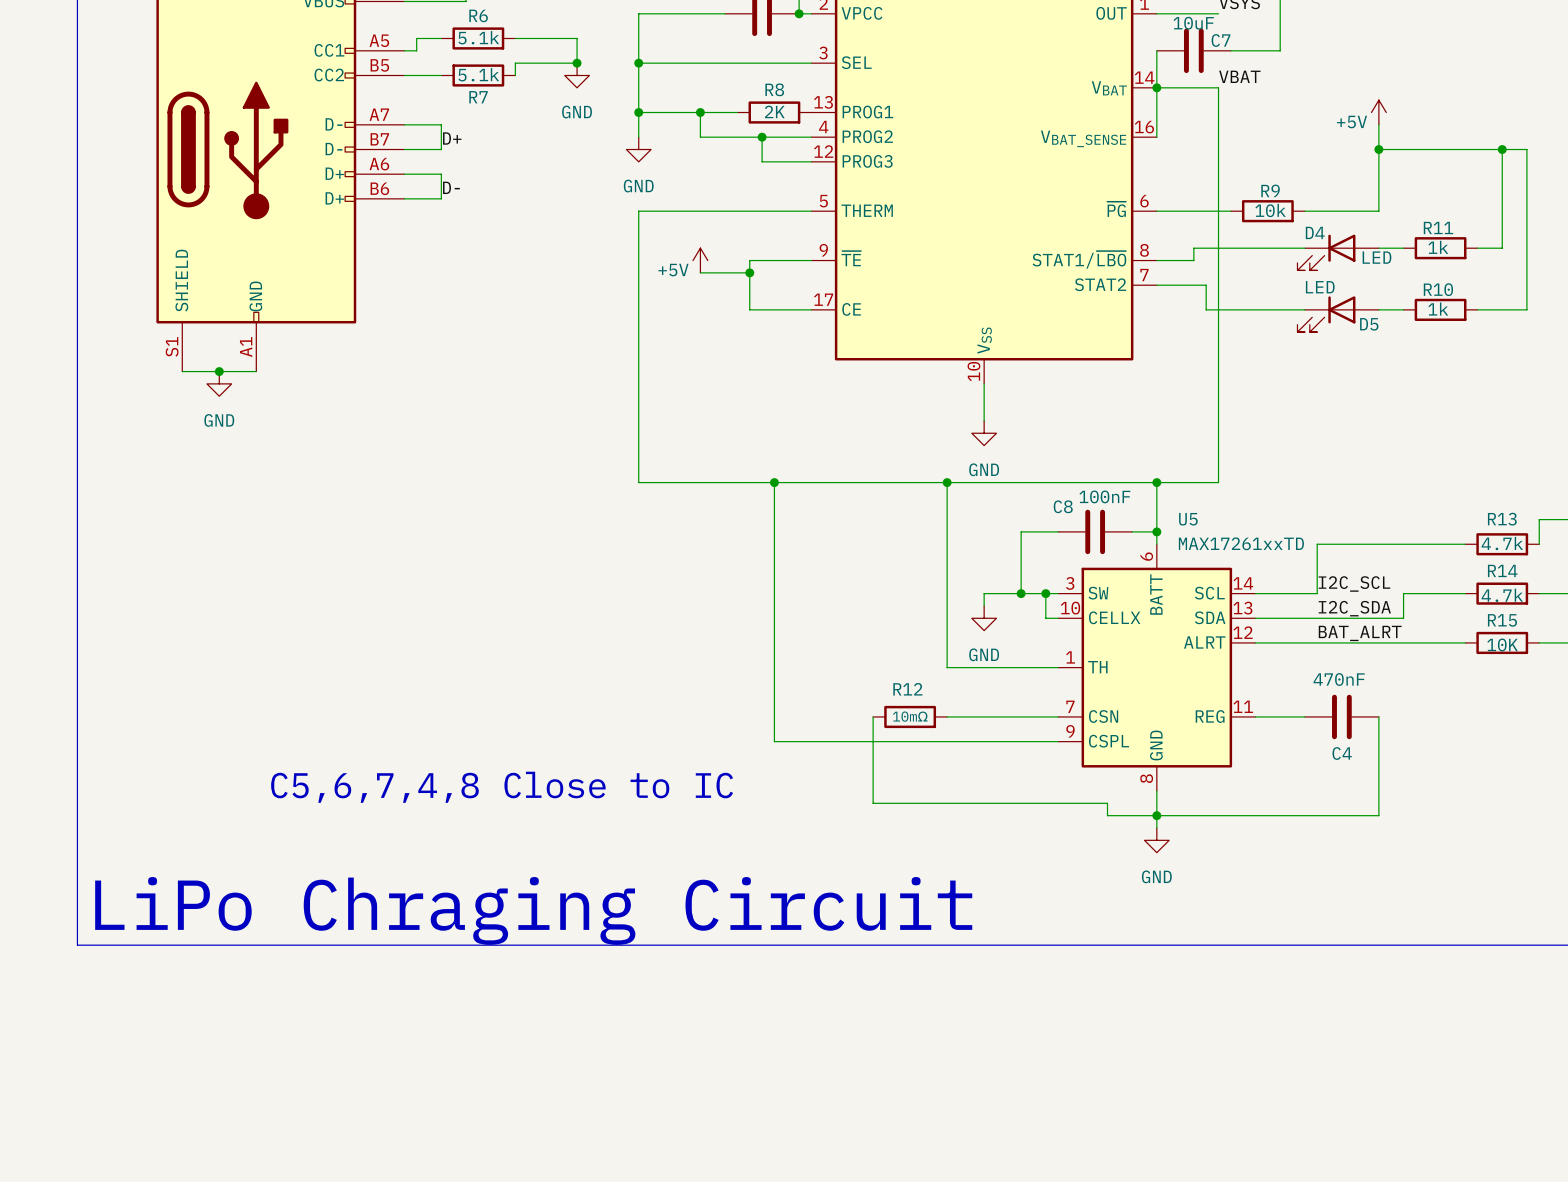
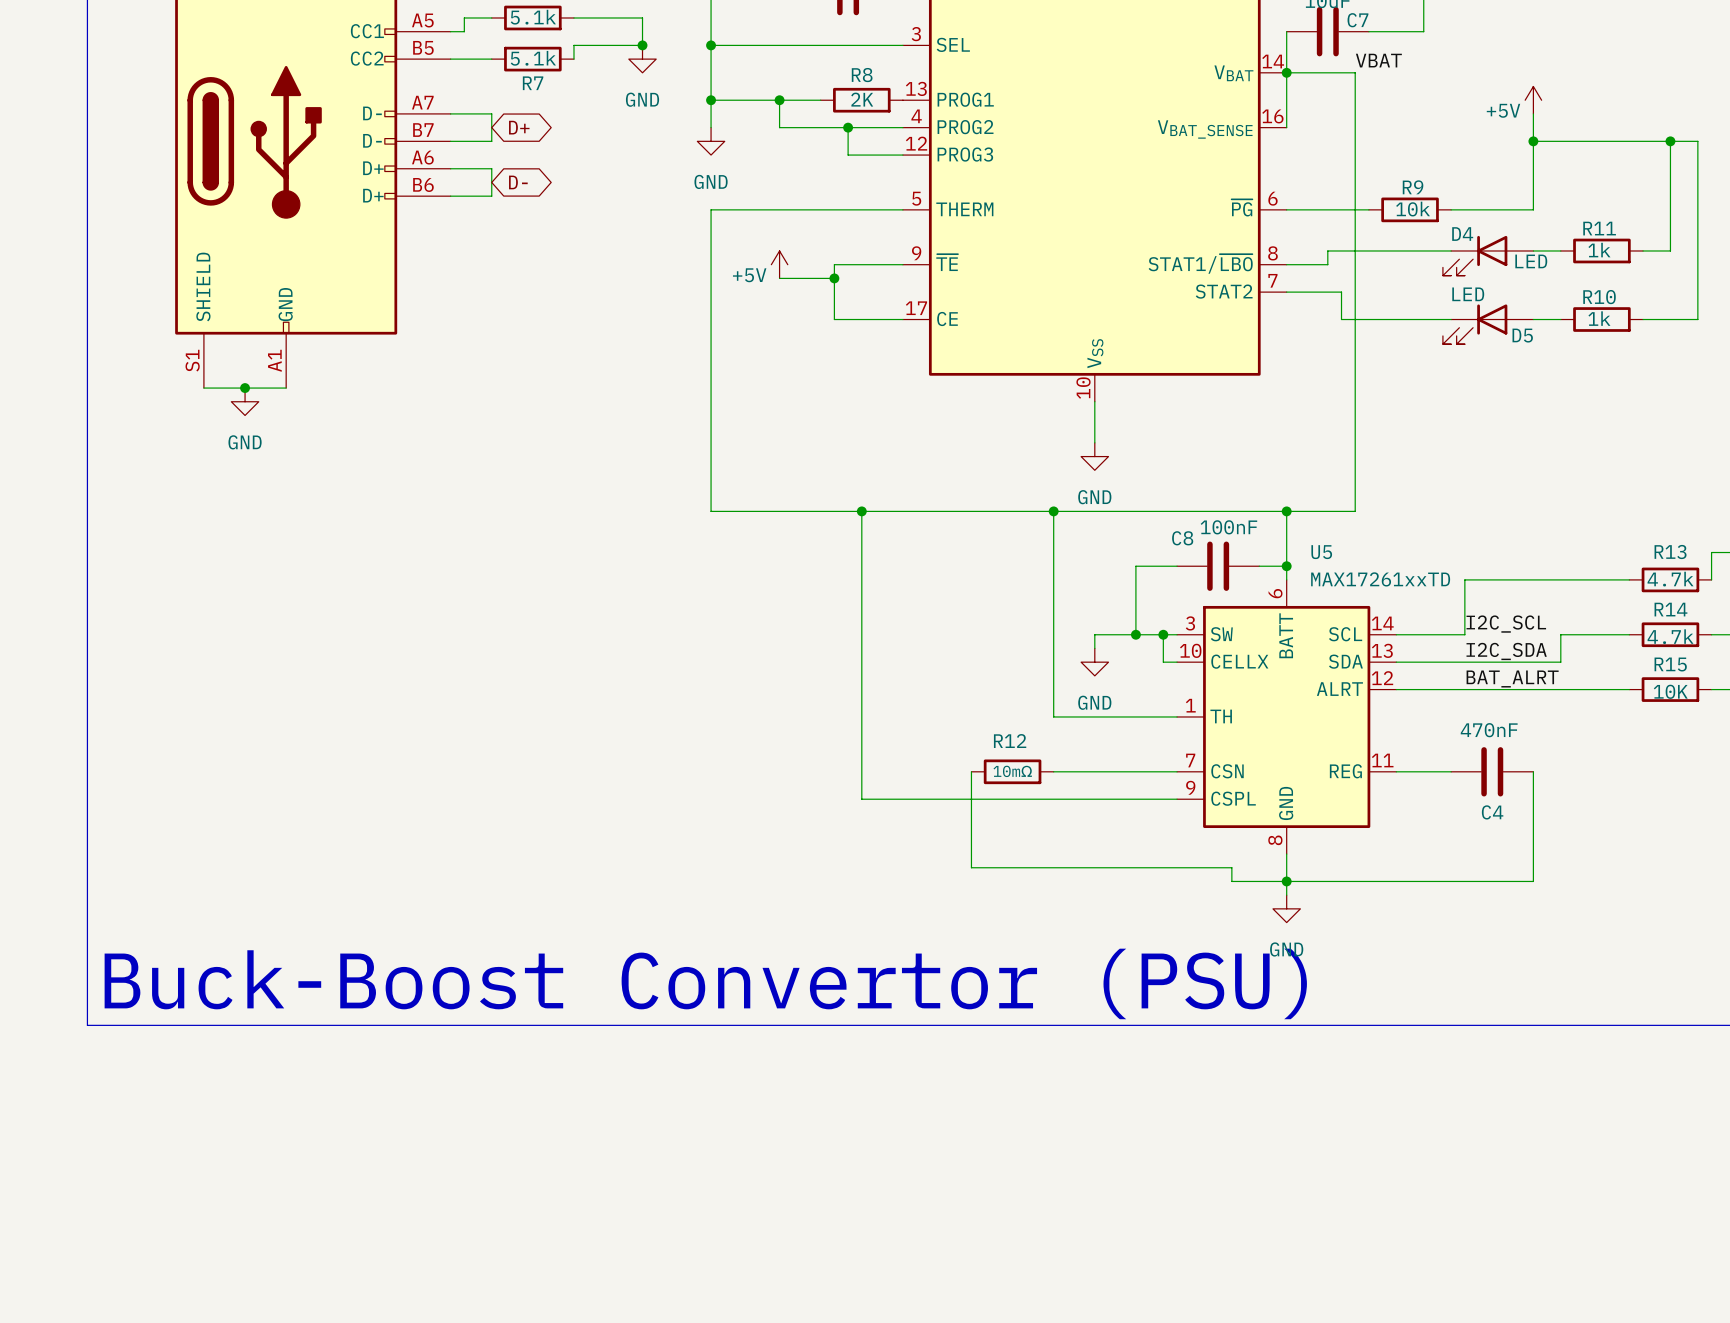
global label: none -> D+ (519, 127)
label: D+ (452, 138) -> none
global label: none -> D- (518, 182)
label: D- (451, 187) -> none
text: C5,6,7,4,8 Close to IC (502, 787) -> none
text: LiPo Chraging Circuit (533, 910) -> Buck-Boost Convertor (PSU) (705, 983)

